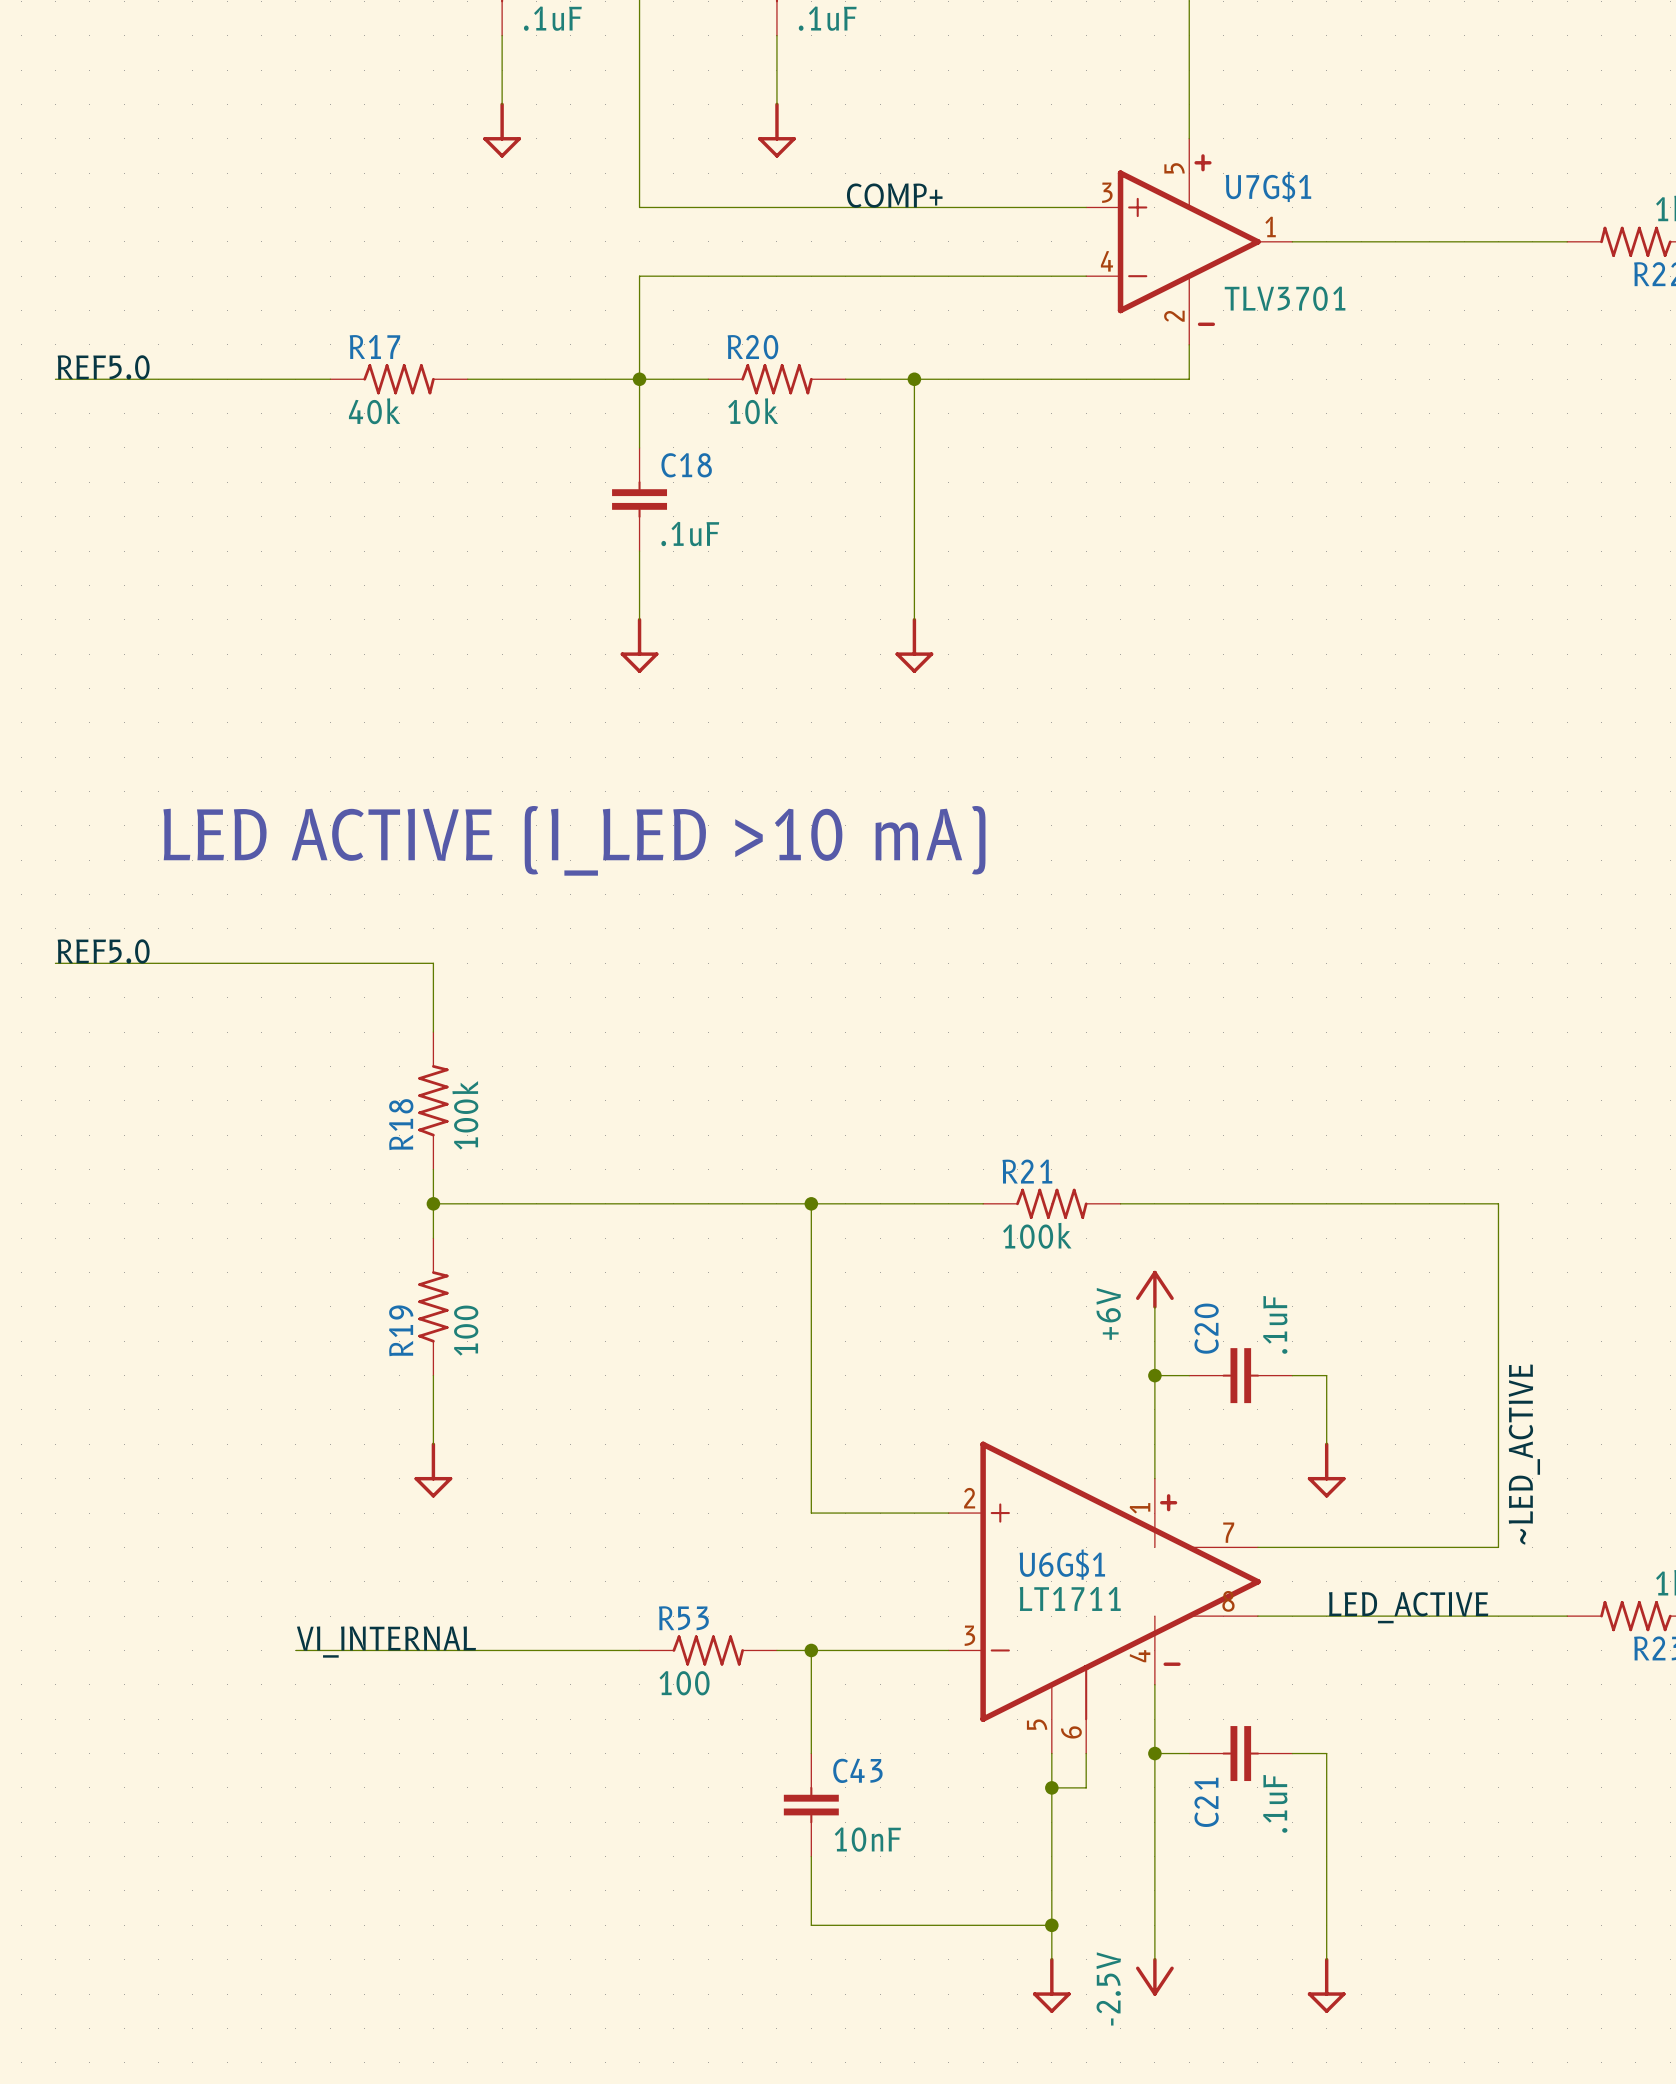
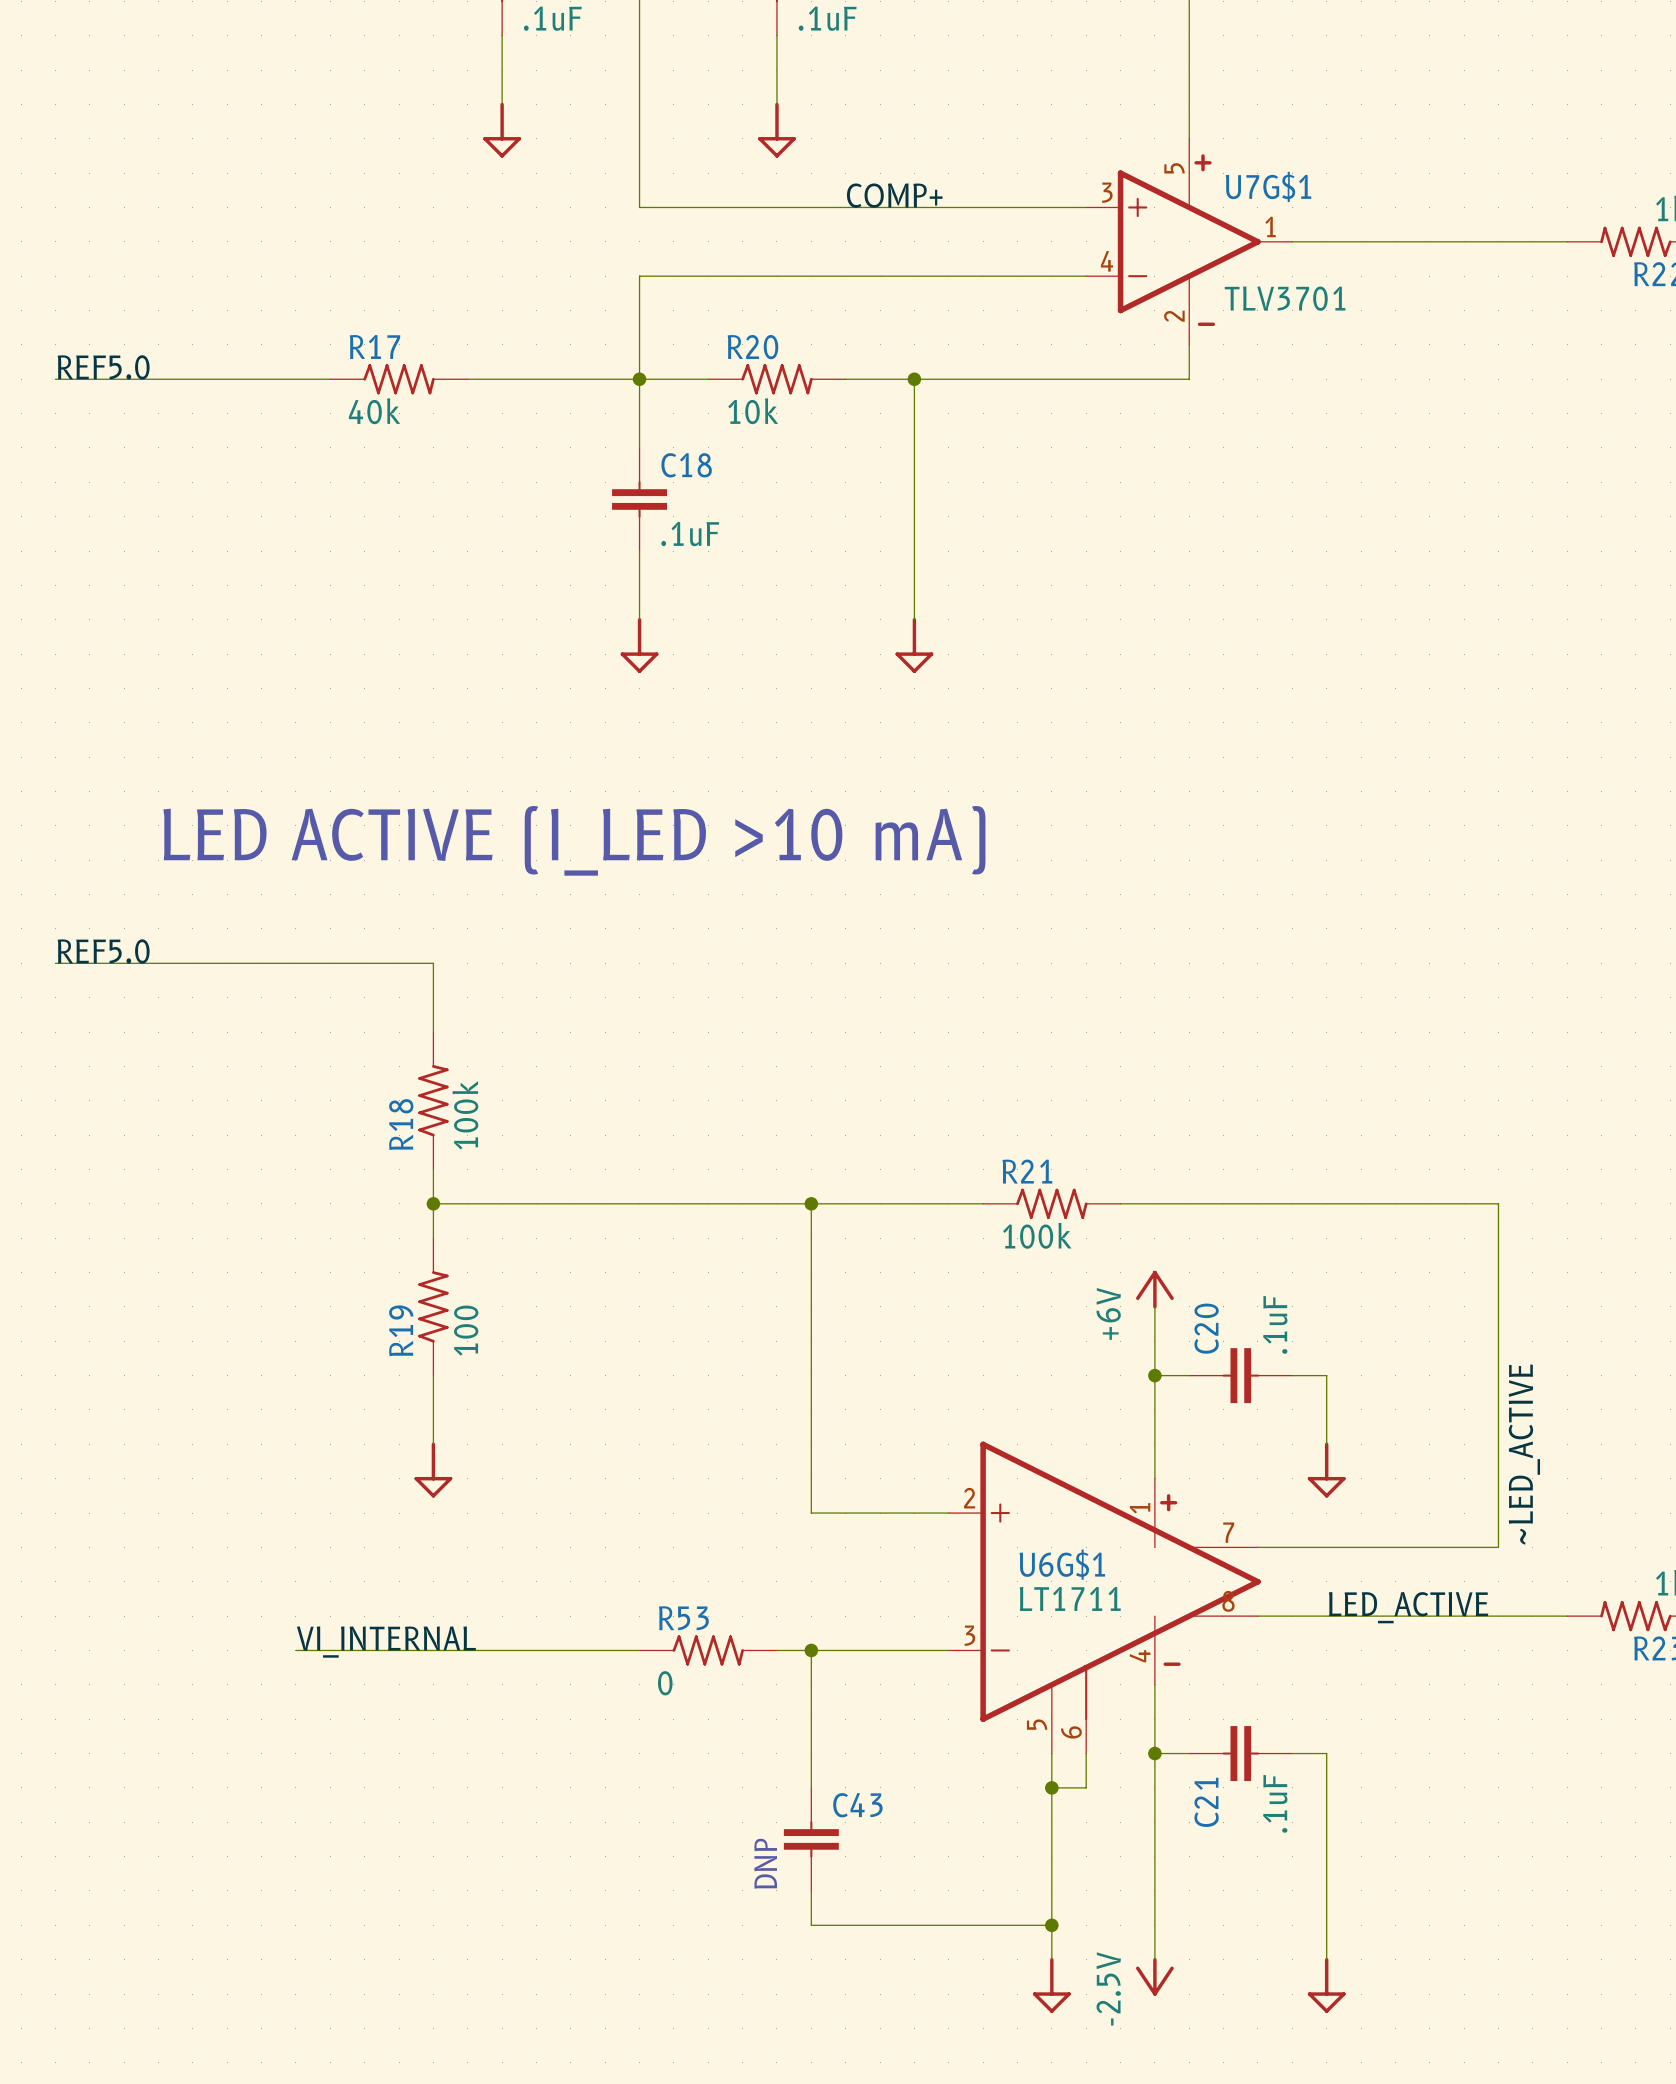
R53 value: 100 (684, 1683) -> 0 (665, 1683)
C43 position: (811, 1805) -> (811, 1839)
C43 value: 10nF (867, 1839) -> none
text: none -> DNP (765, 1863)

